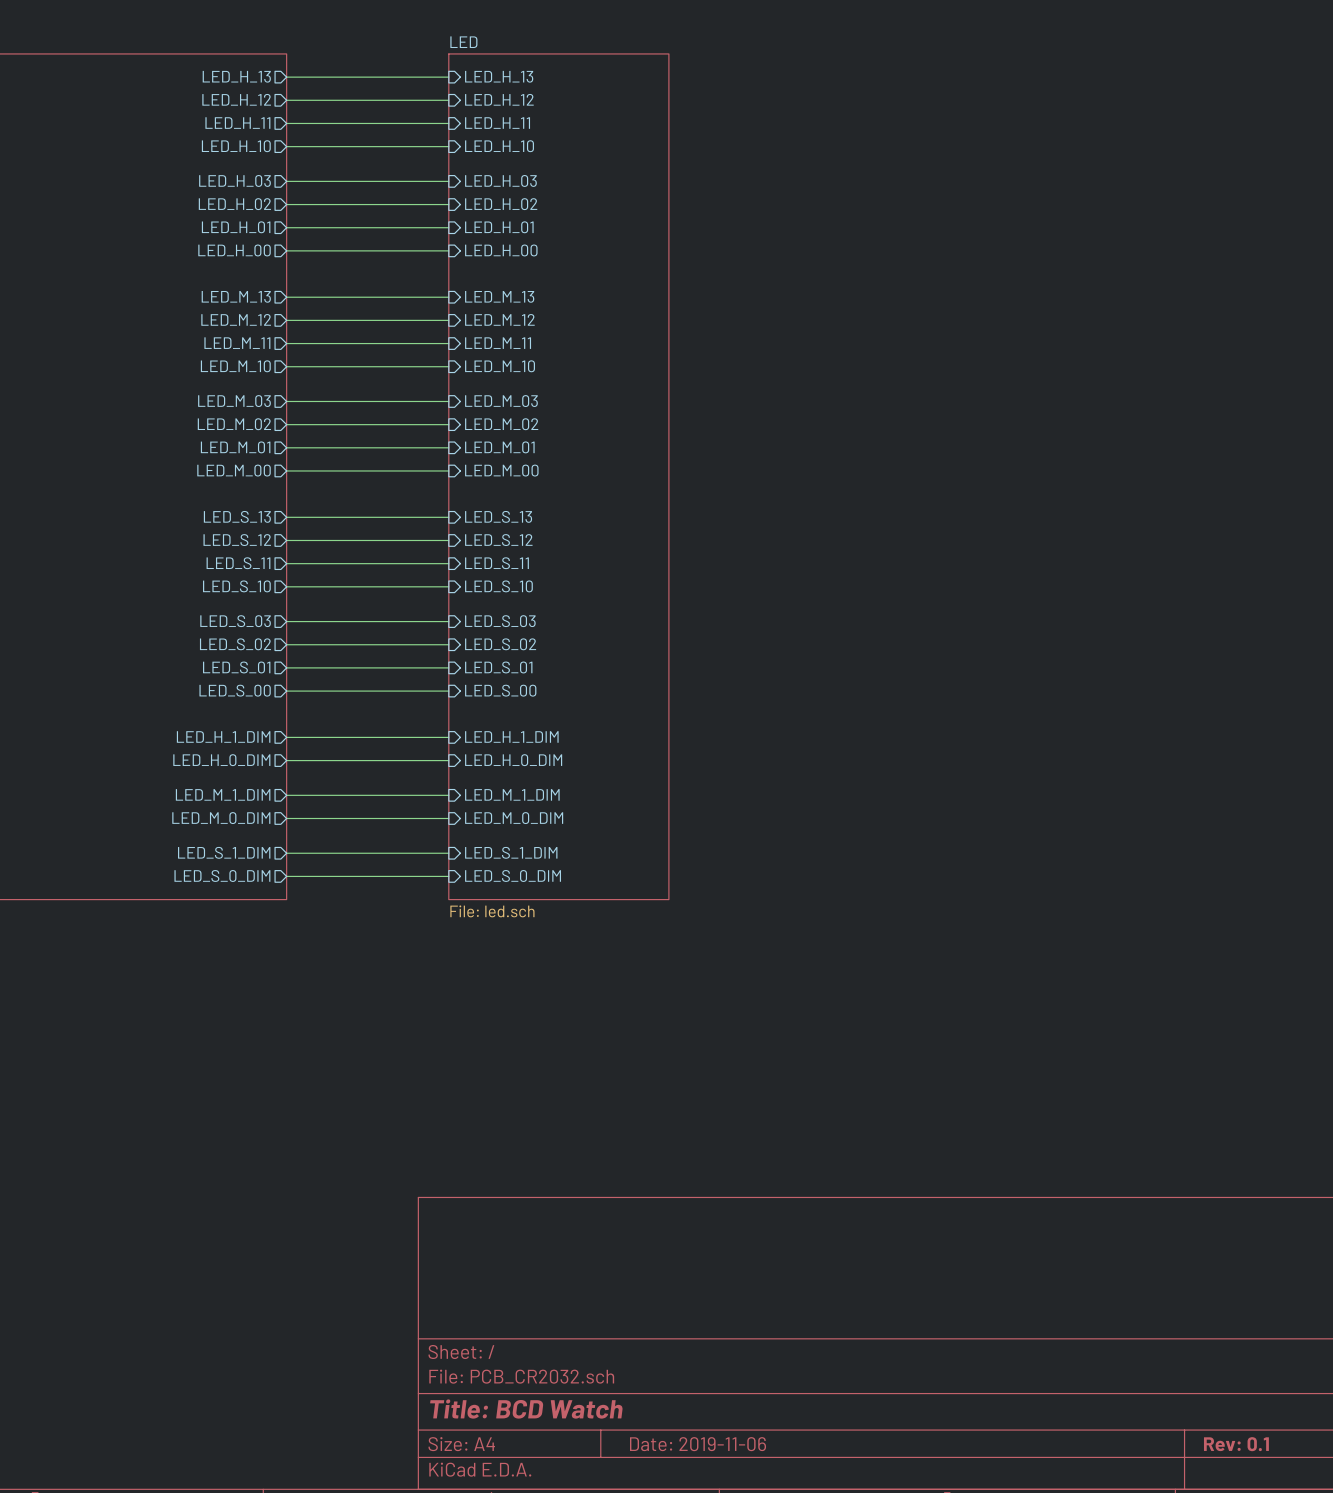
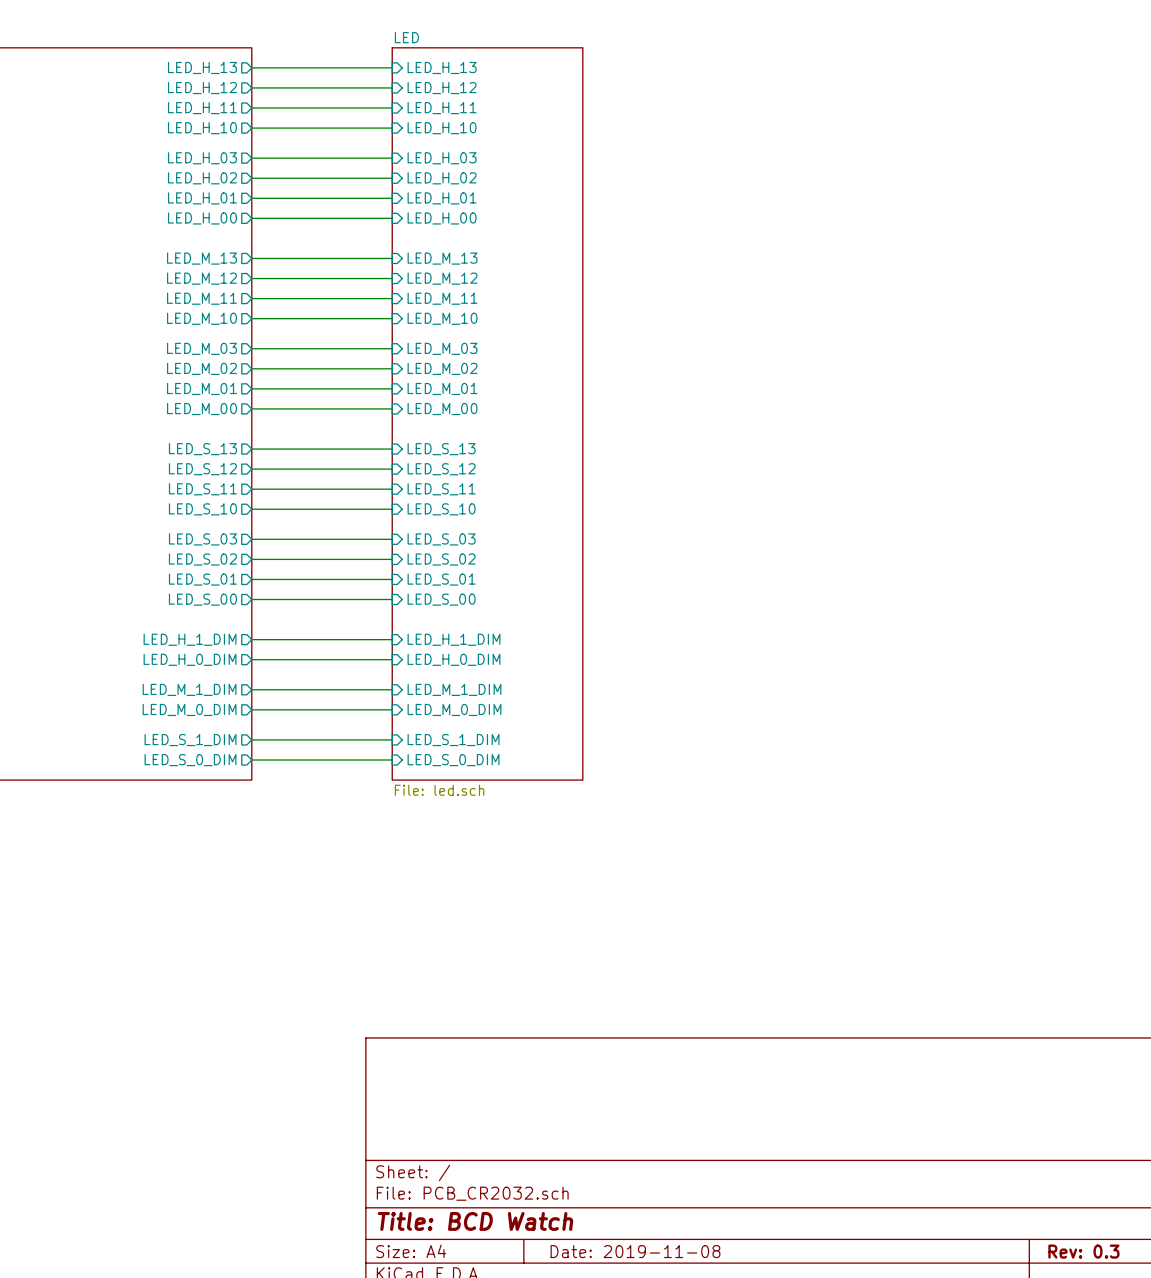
title block: Date: 2019-11-06 (698, 1444) -> Date: 2019-11-08 (635, 1251)
title block: Rev: 0.1 (1236, 1444) -> Rev: 0.3 (1083, 1251)

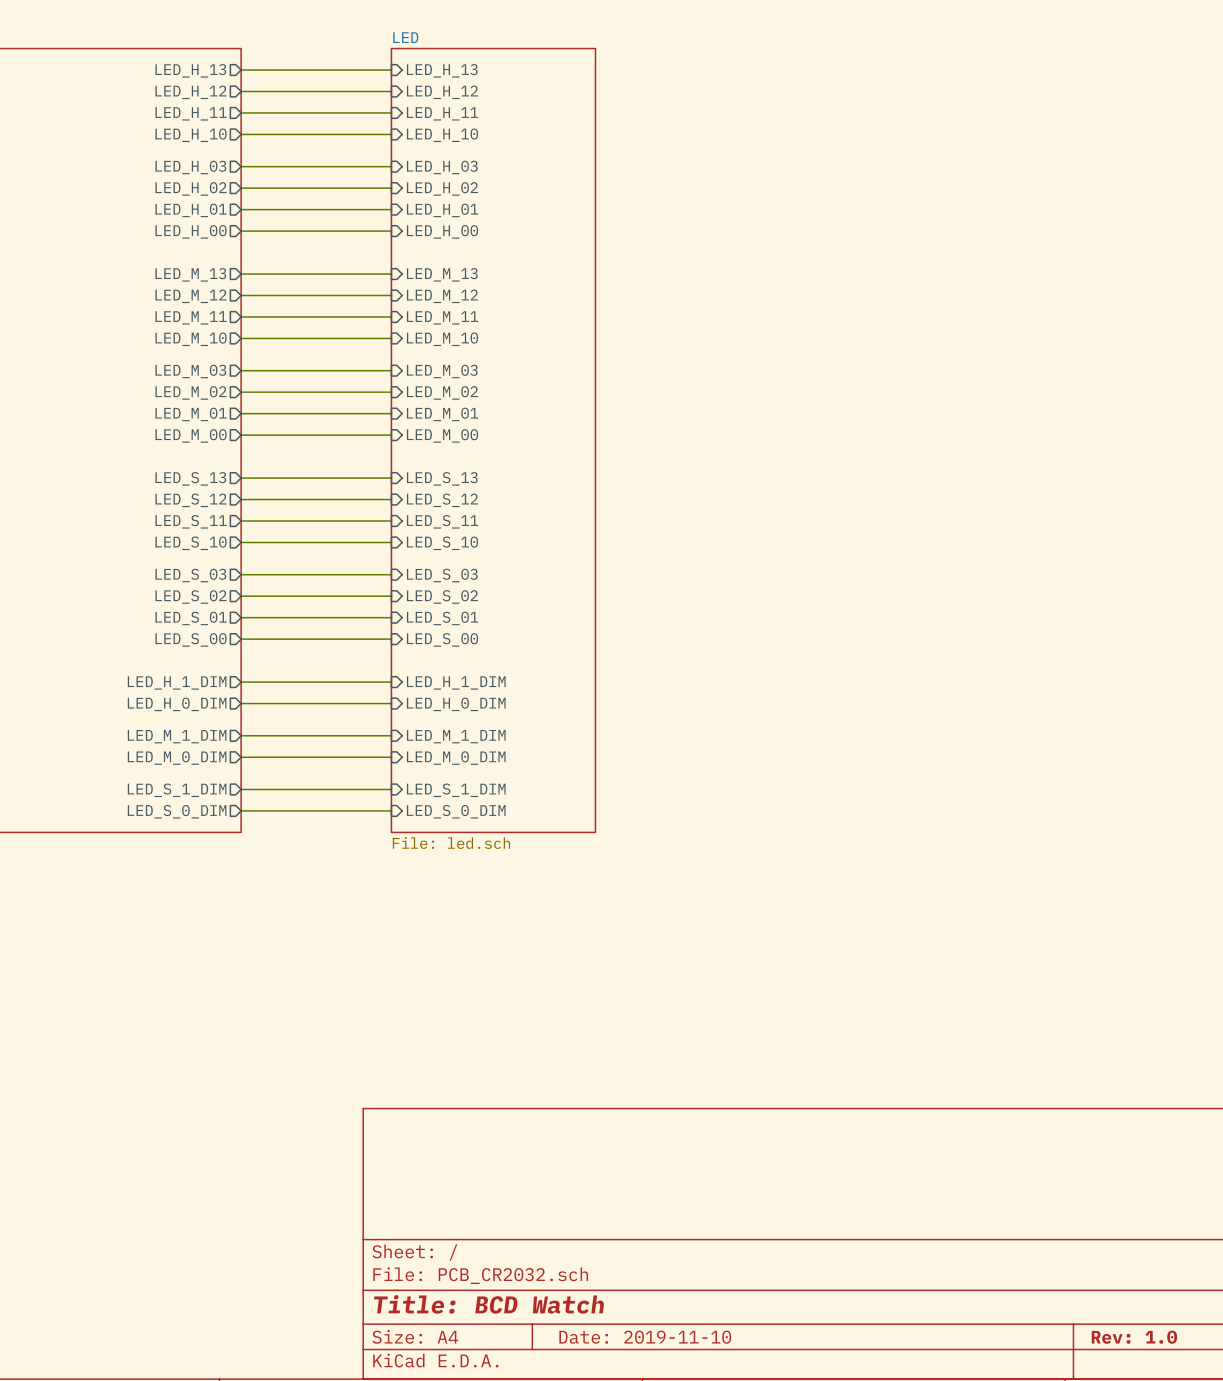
title block: Date: 2019-11-08 (635, 1251) -> Date: 2019-11-10 (645, 1337)
title block: Rev: 0.3 (1083, 1251) -> Rev: 1.0 (1134, 1337)

